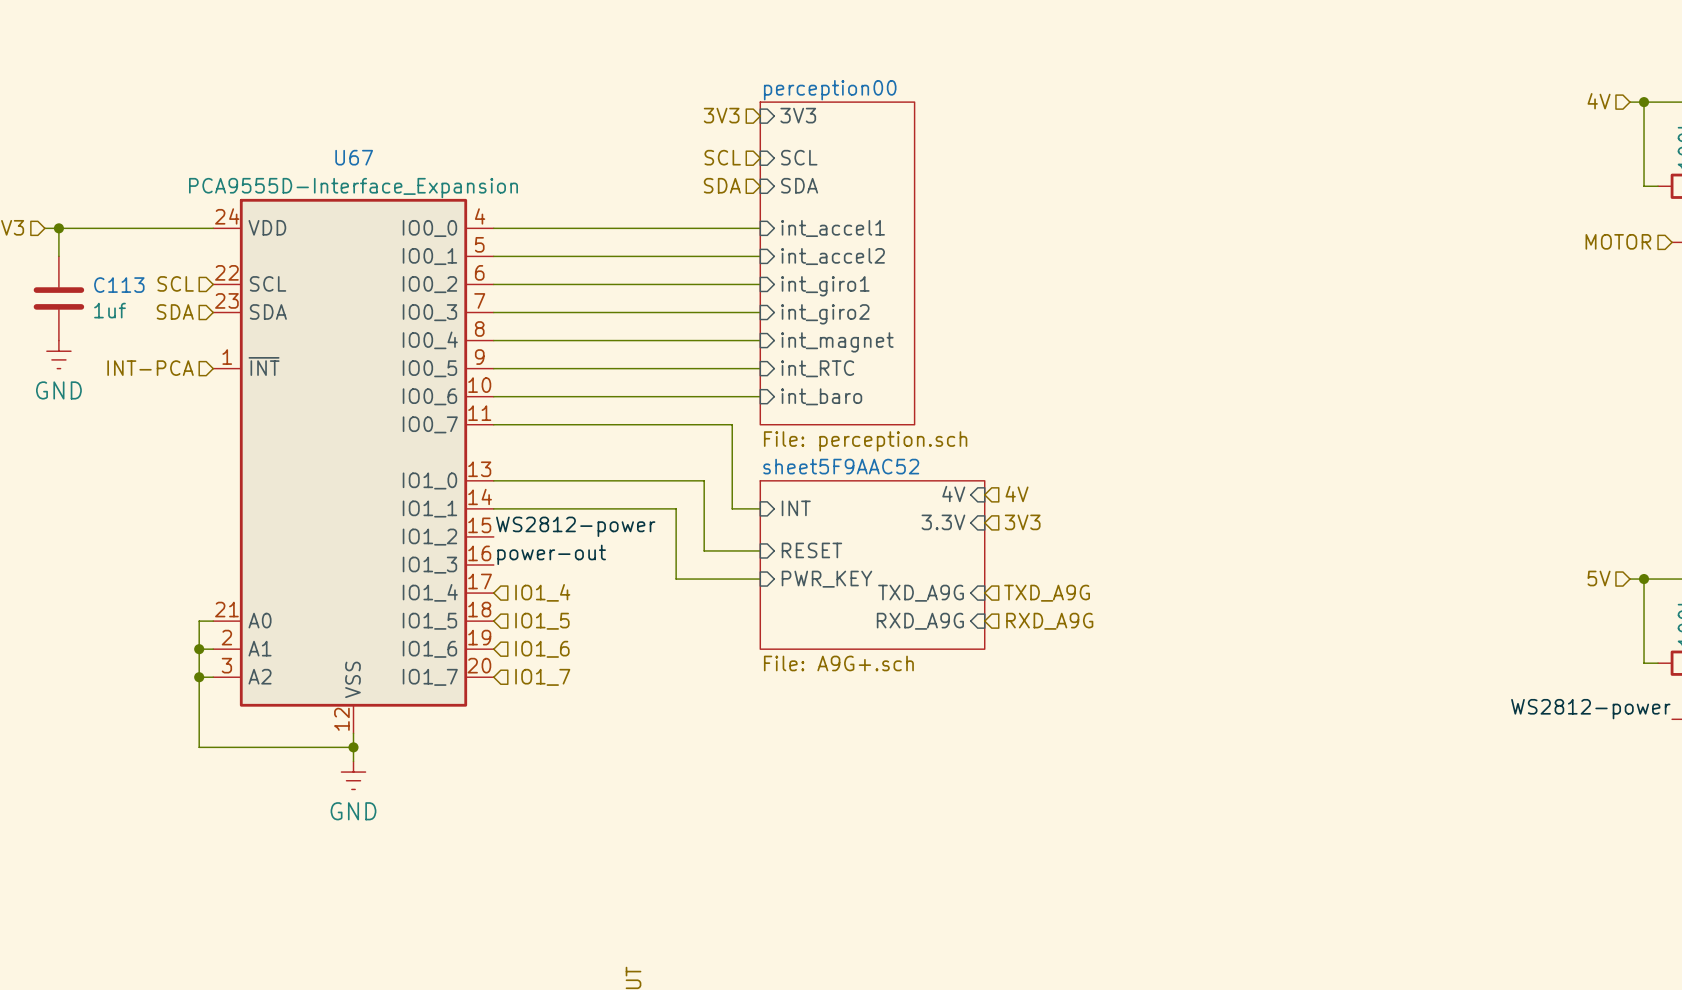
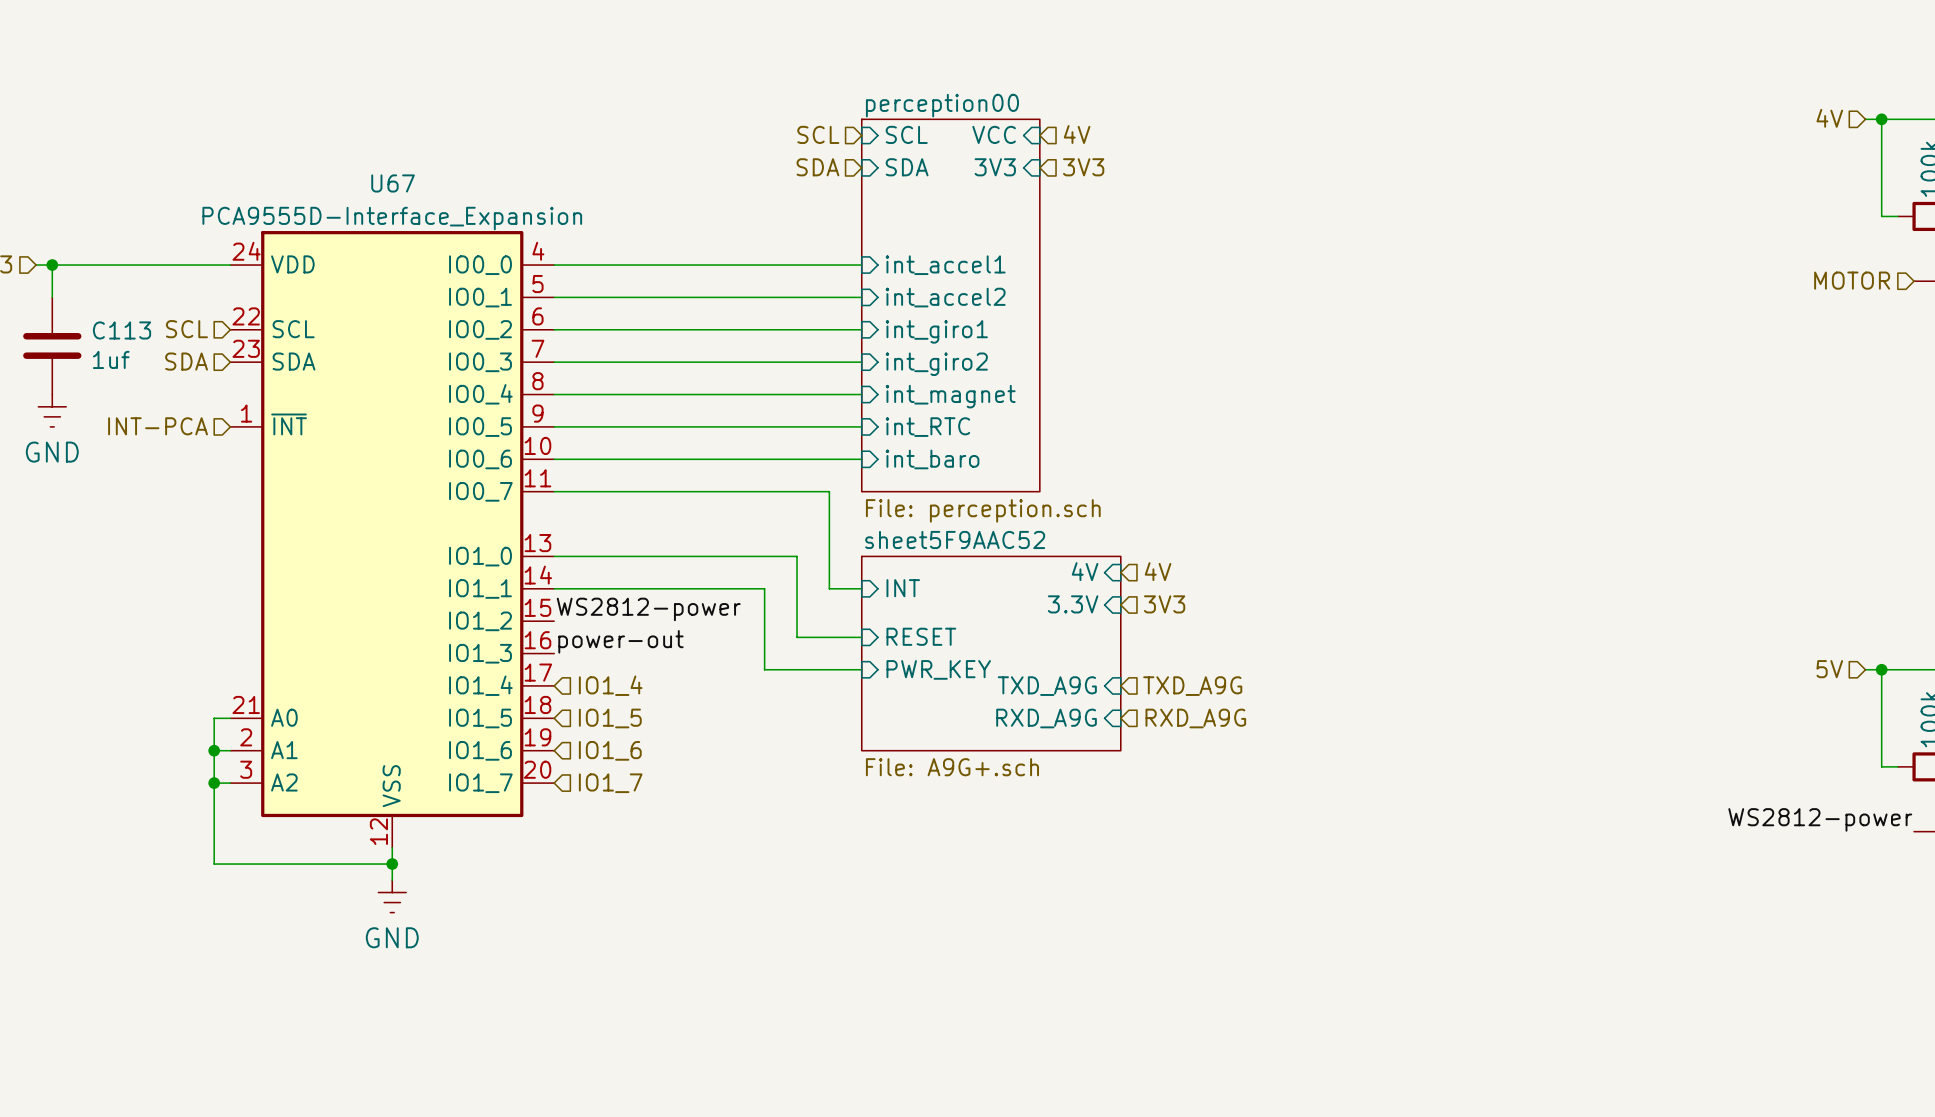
hierarchical label: 3V3 (721, 115) -> SCL (818, 134)
sheet pin: 3V3 (798, 115) -> SCL (906, 134)
sheet pin: none -> VCC (994, 134)
hierarchical label: none -> 4V (1077, 134)
sheet pin: none -> 3V3 (995, 167)
hierarchical label: none -> 3V3 (1083, 167)
hierarchical label: SCL (722, 157) -> none
sheet pin: SCL (799, 157) -> none
hierarchical label position: SDA (722, 185) -> SDA (817, 167)
sheet pin position: SDA (799, 185) -> SDA (907, 167)

